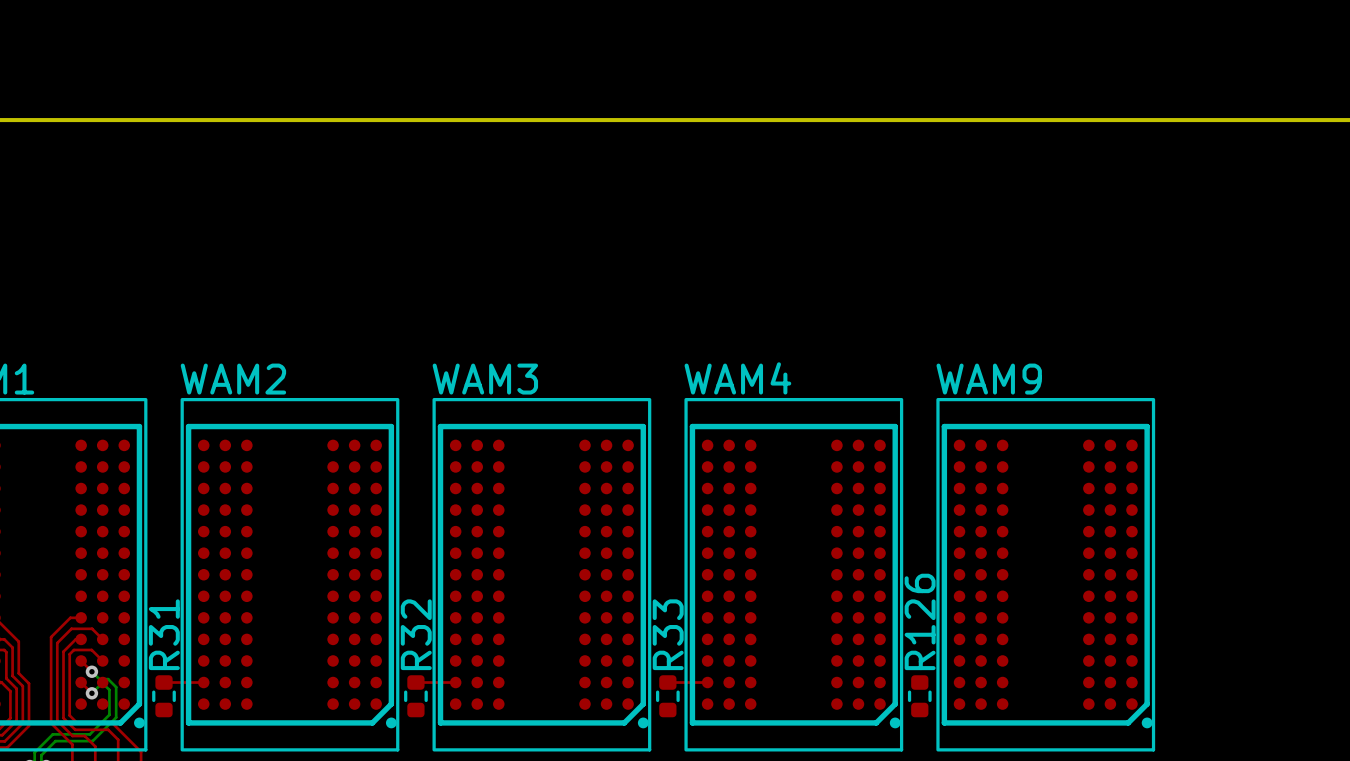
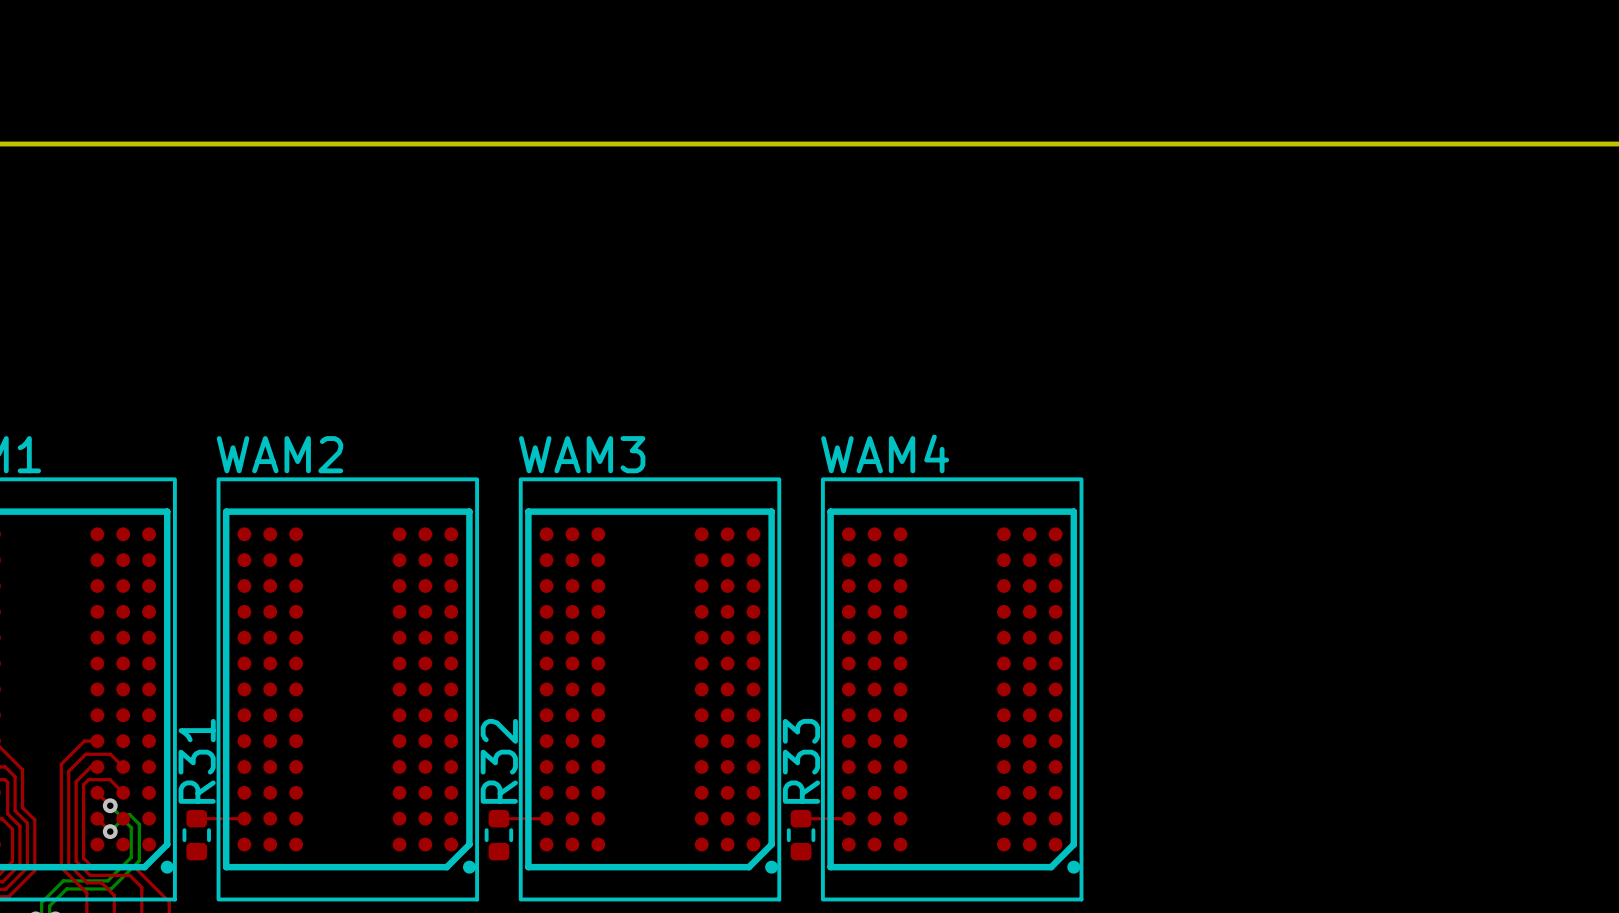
WAM9: (1045, 574) -> none
R126: (919, 696) -> none

